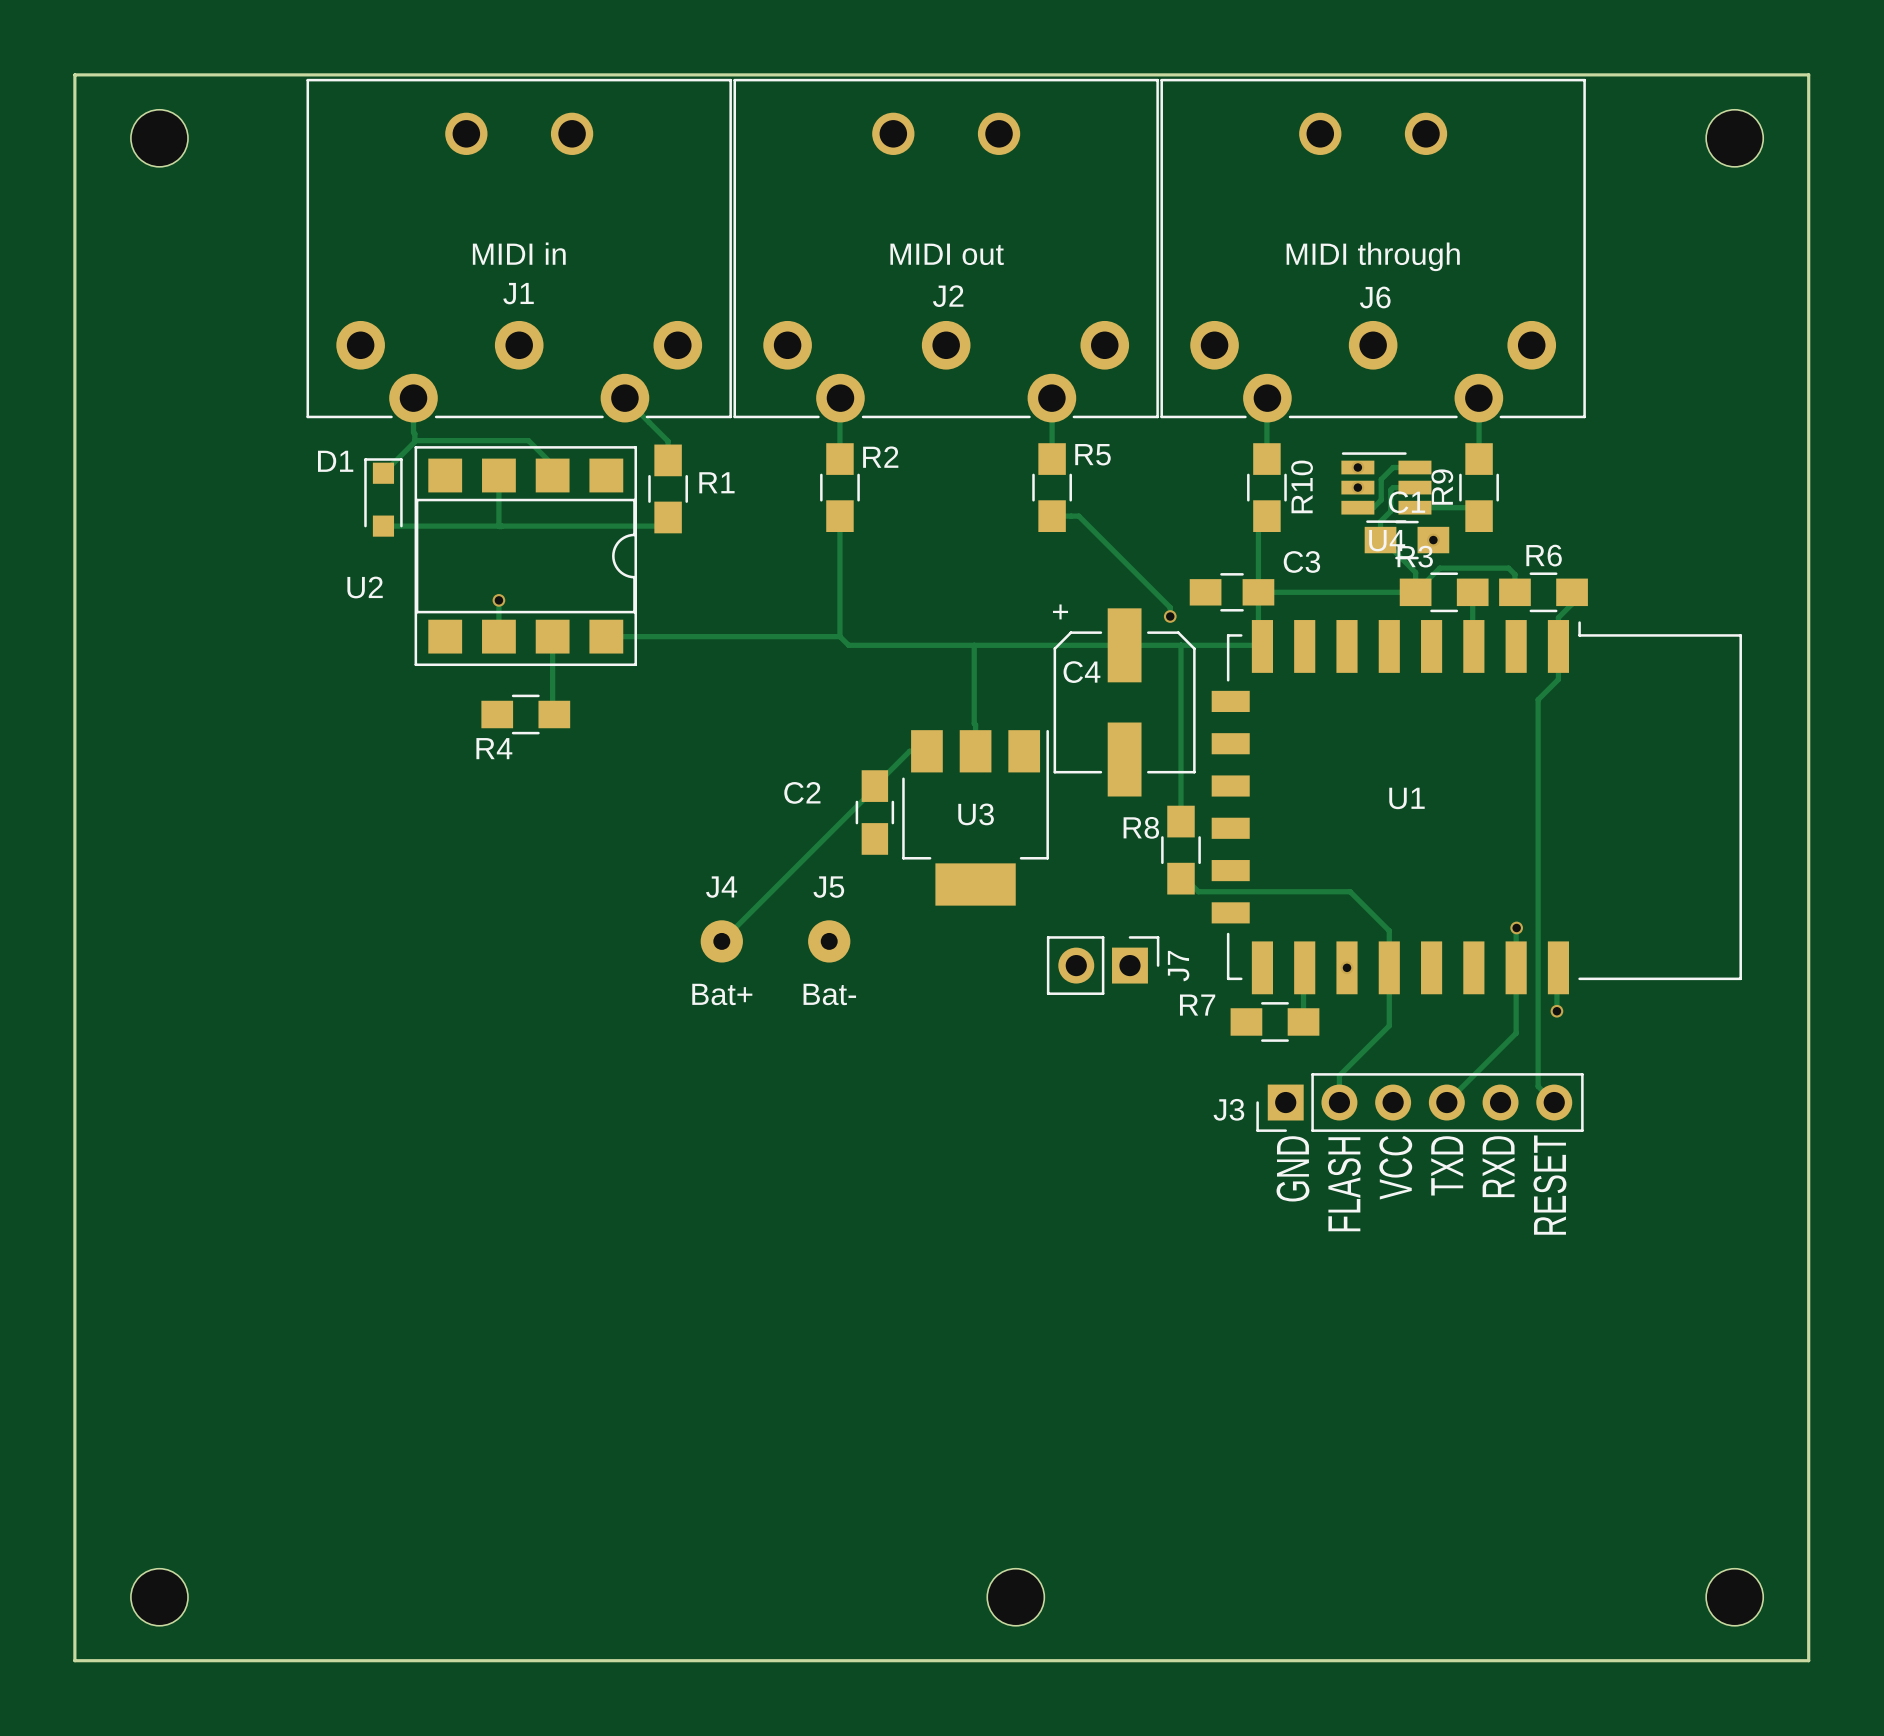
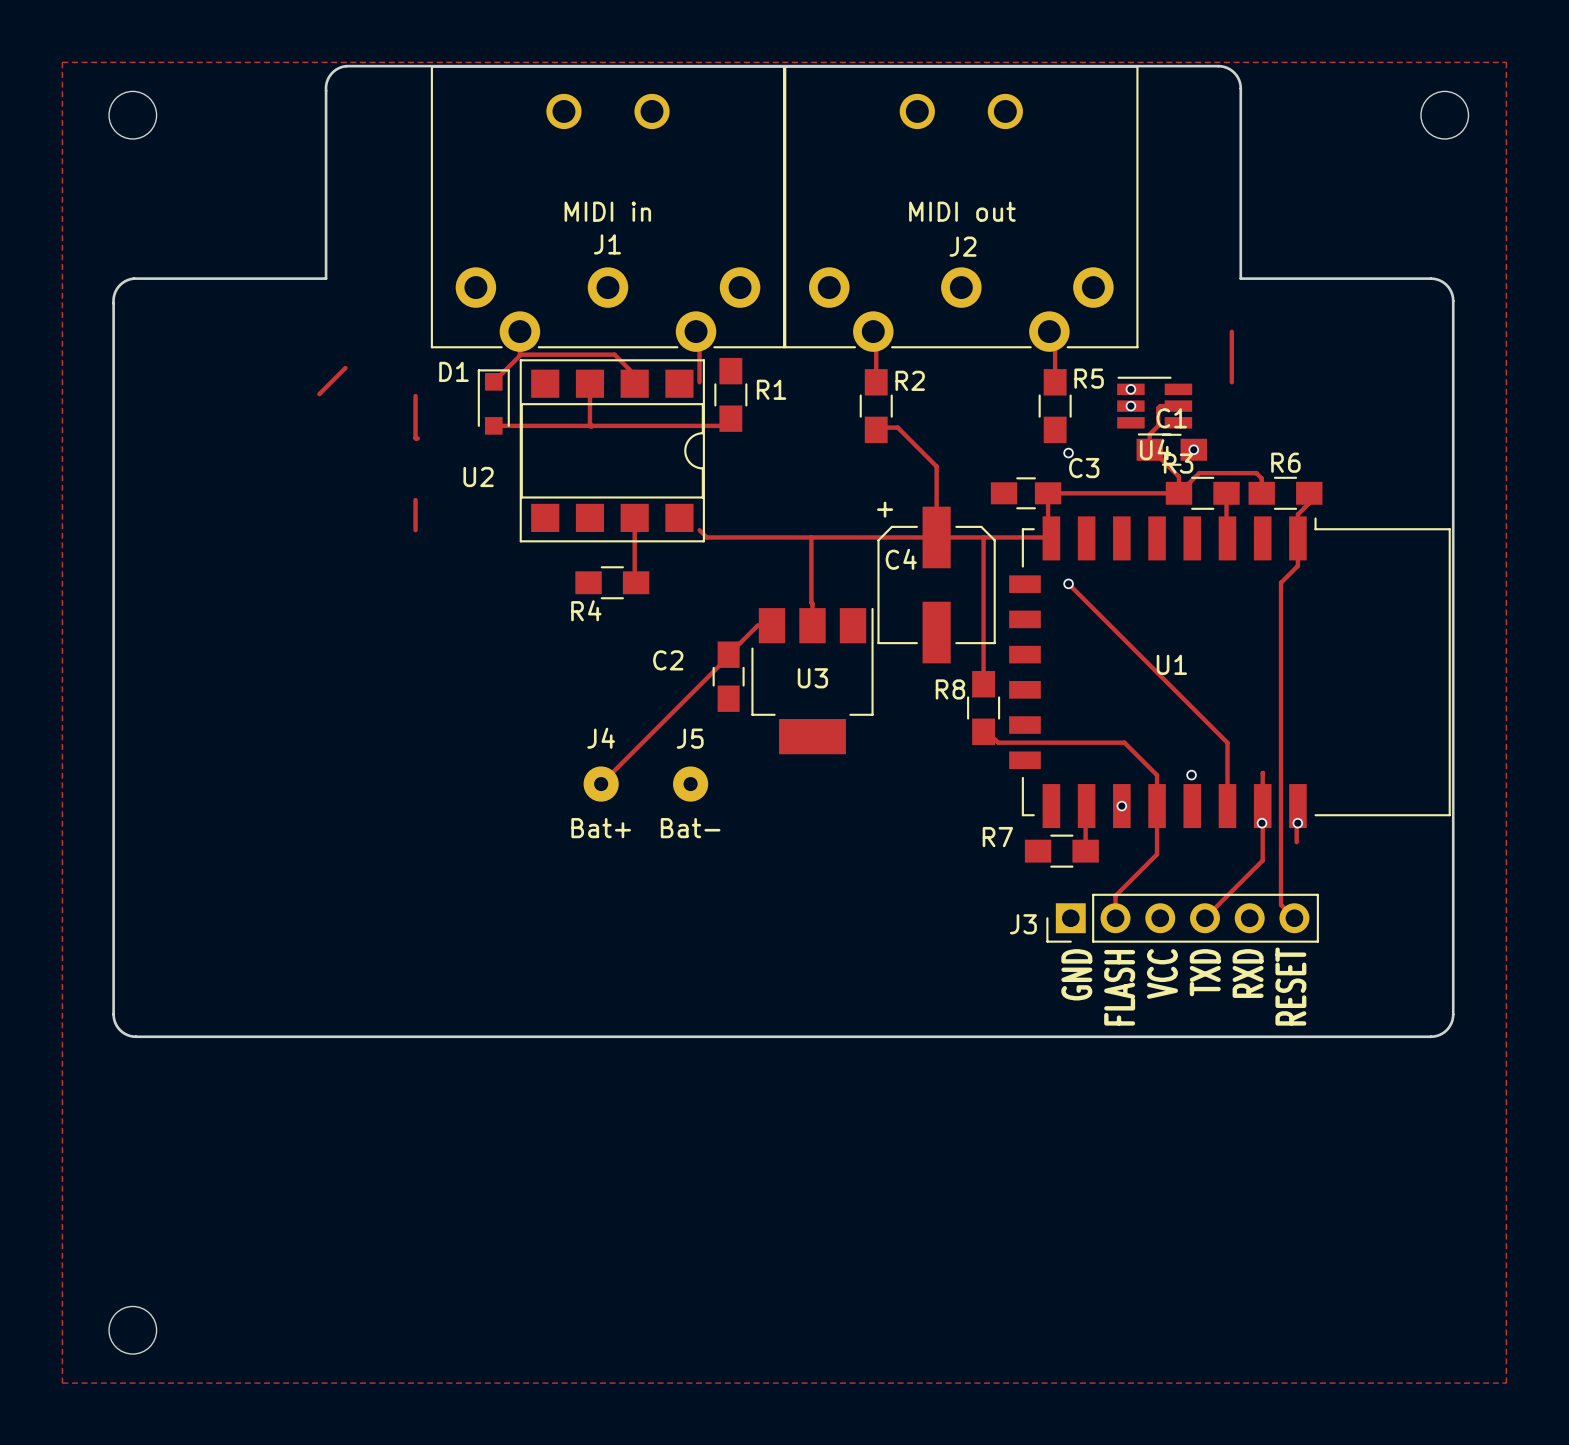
board edge: (74, 74) (74, 1660) (1808, 1660) (1808, 74) (74, 74) -> (346, 66) (1218, 66) (1232, 70) (1237, 77) (1240, 88) (1240, 278) (1433, 278) (1446, 285) (1452, 295) (1453, 1014) (1448, 1028) (1442, 1033) (1430, 1036) (135, 1036) (122, 1032) (116, 1025) (113, 1014) (114, 294) (122, 282) (133, 278) (326, 278) (325, 87) (327, 79) (333, 72) (346, 66)
J1 position: (519, 250) -> (607, 208)
J2 position: (946, 250) -> (961, 208)
J6: MIDI through (1373, 250) -> none
track: (413, 398) (414, 440) (528, 440) (552, 464) (552, 475) -> none
track: (624, 398) (668, 441) (668, 460) -> (519, 331) (519, 355) (493, 381)
track: none -> (519, 354) (614, 354) (634, 374) (634, 383)
R5 name: R5 (1093, 454) -> R2 (910, 380)
track: none -> (589, 383) (589, 425) (592, 425)
track: (1414, 467) (1393, 467) (1381, 479) (1381, 499) (1373, 507) (1357, 507) -> none
R10 name: R10 (1302, 486) -> R5 (1089, 378)
R2: (839, 487) -> none
R9: (1479, 487) -> none
R1 position: (668, 488) -> (730, 394)
D1 position: (383, 497) -> (493, 402)
track: (1414, 507) (1470, 507) (1479, 516) -> none
track: none -> (873, 427) (897, 427) (936, 466) (936, 537)
track: (839, 516) (839, 636) (606, 636) -> none
track: (1052, 516) (1078, 516) (1170, 607) (1170, 616) -> none
track: (1266, 516) (1258, 524) (1258, 592) -> none
track: (668, 517) (659, 526) (383, 526) -> (730, 418) (723, 425) (493, 425)
via: none -> (1068, 453)
U2 position: (525, 556) -> (612, 450)
via: (498, 600) -> none
via: (1170, 616) -> none
track: (552, 636) (552, 712) (554, 714) -> (634, 517) (636, 582)
track: none -> (1068, 583) (1227, 742) (1227, 806)
via: none -> (1068, 583)
R4 position: (525, 714) -> (612, 582)
via: (1516, 927) -> none
via: none -> (1191, 775)
J7: (1103, 965) -> none
via: none -> (1262, 823)
via position: (1556, 1011) -> (1297, 823)
part: (1015, 1597) -> none
part: (1734, 1597) -> none

